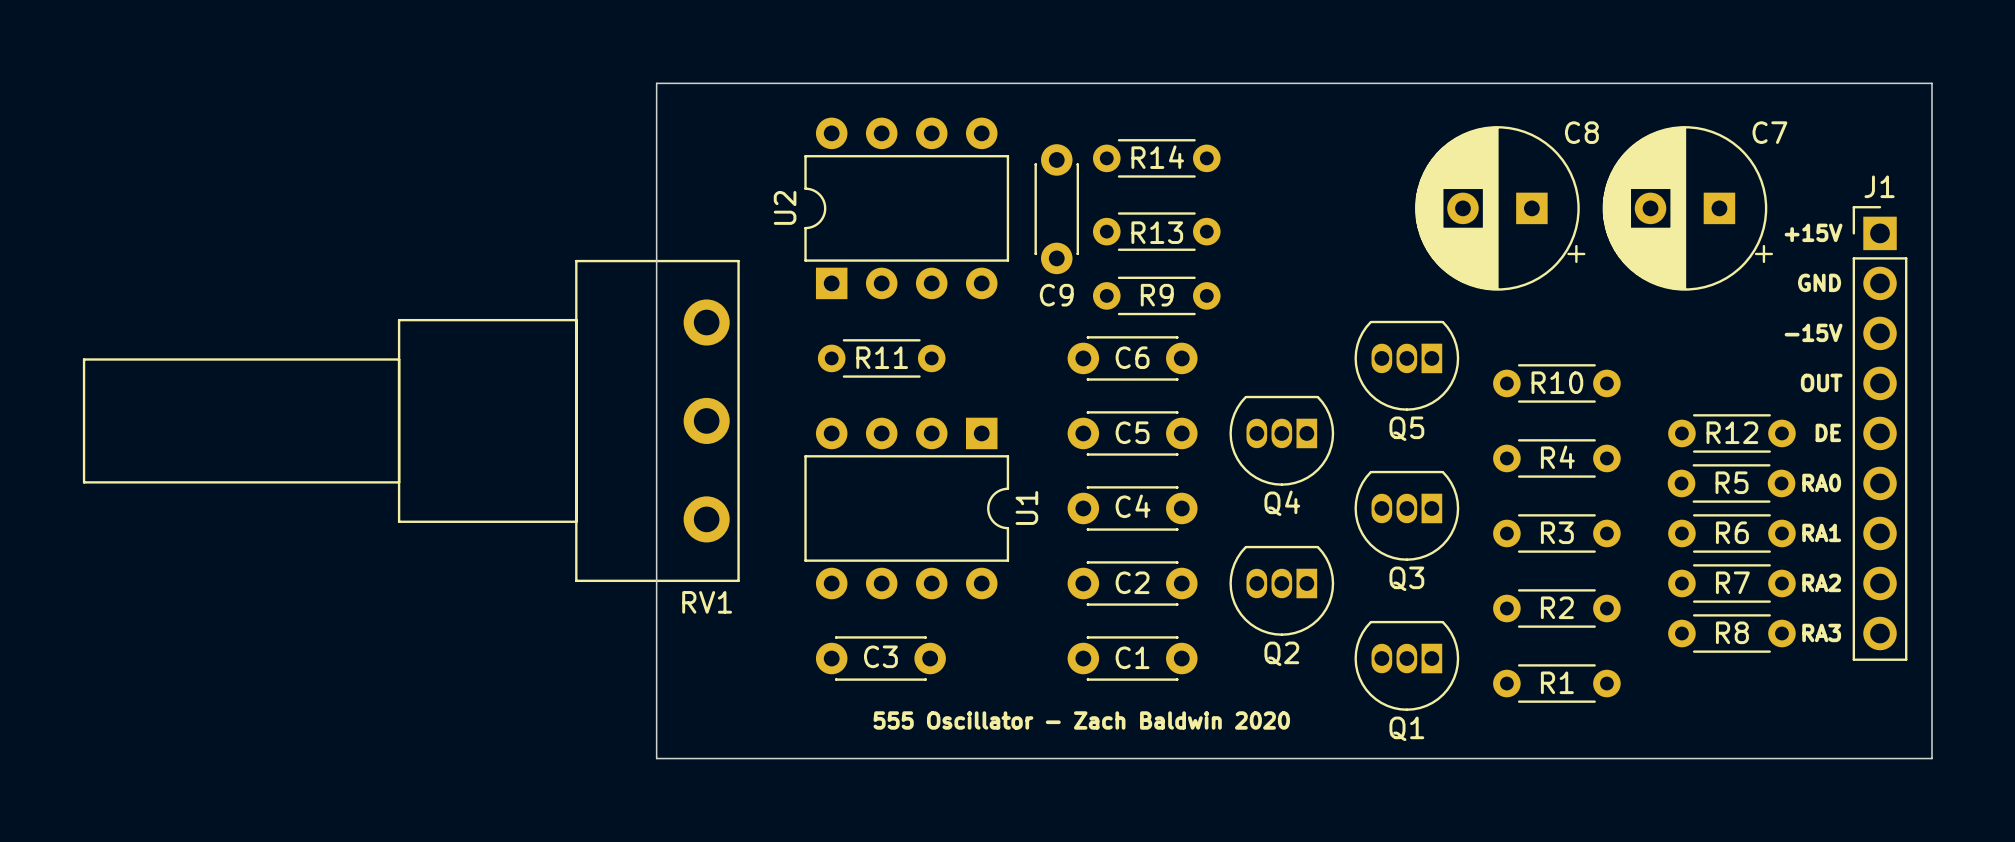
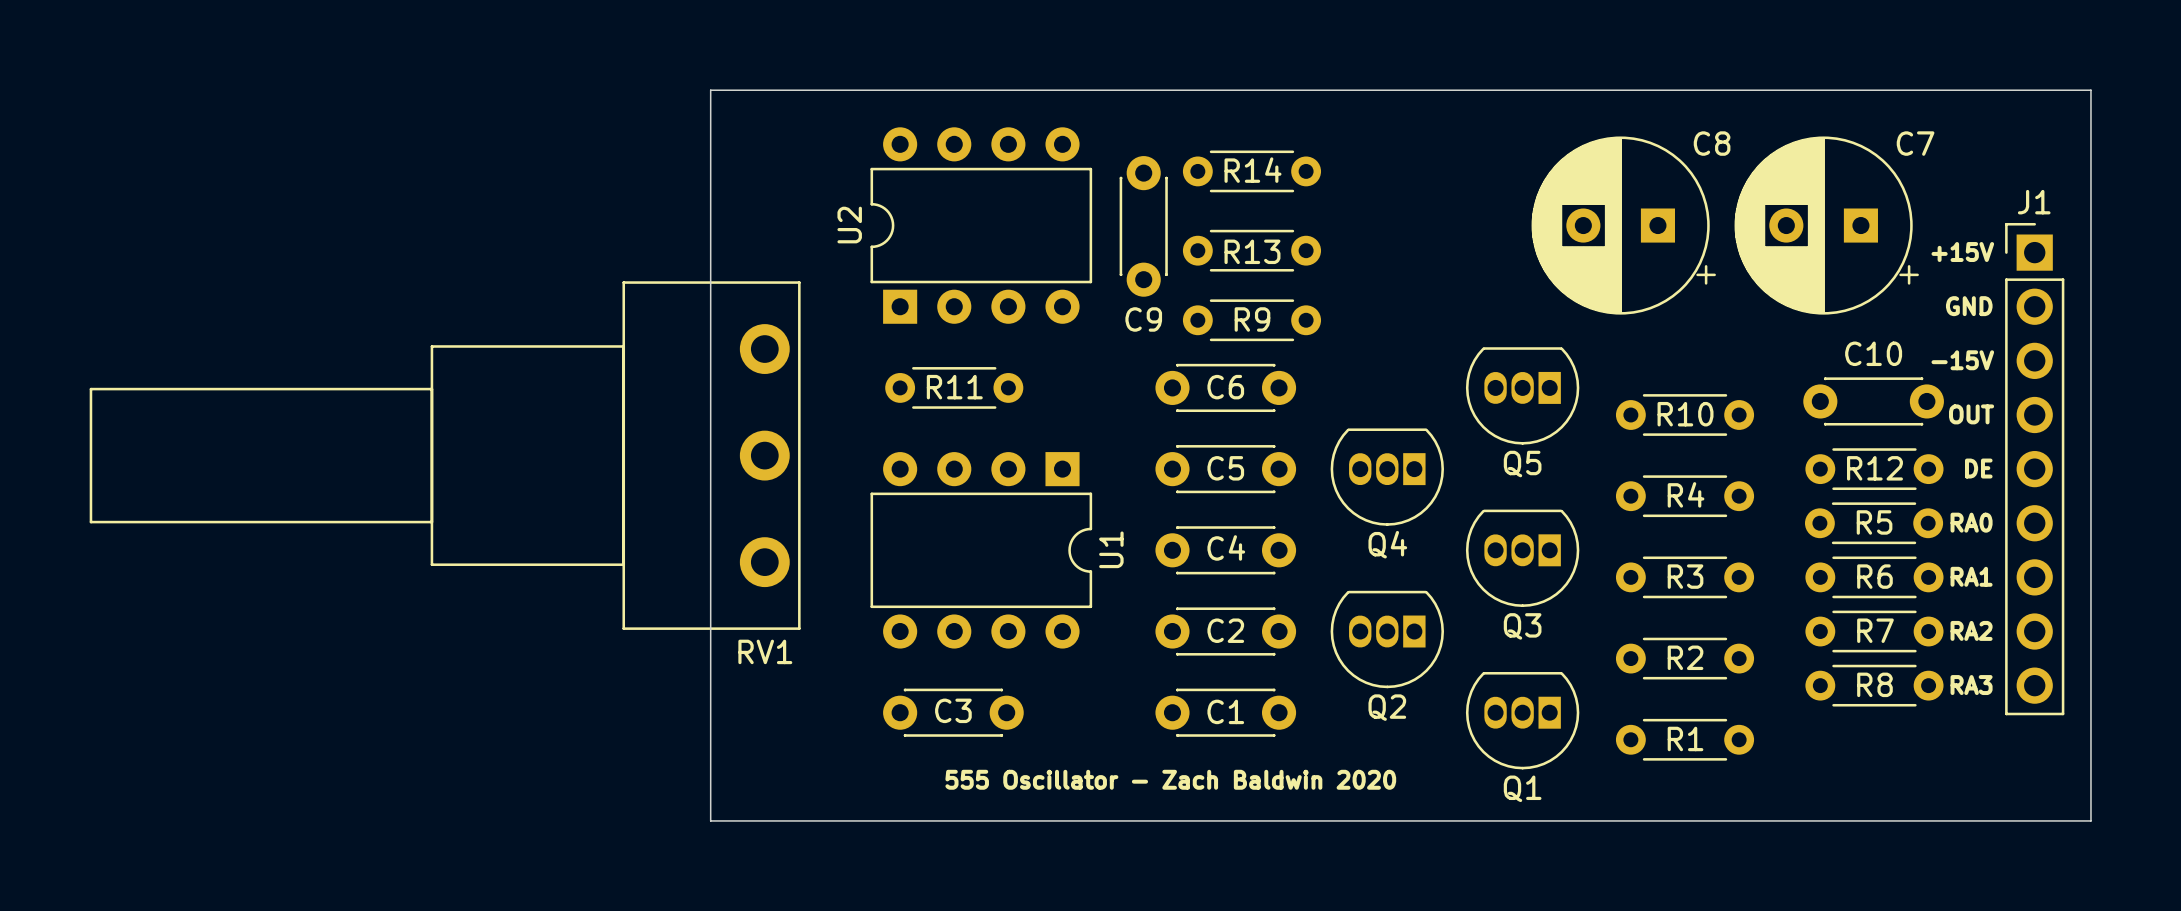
C10: none -> (1873, 401)

